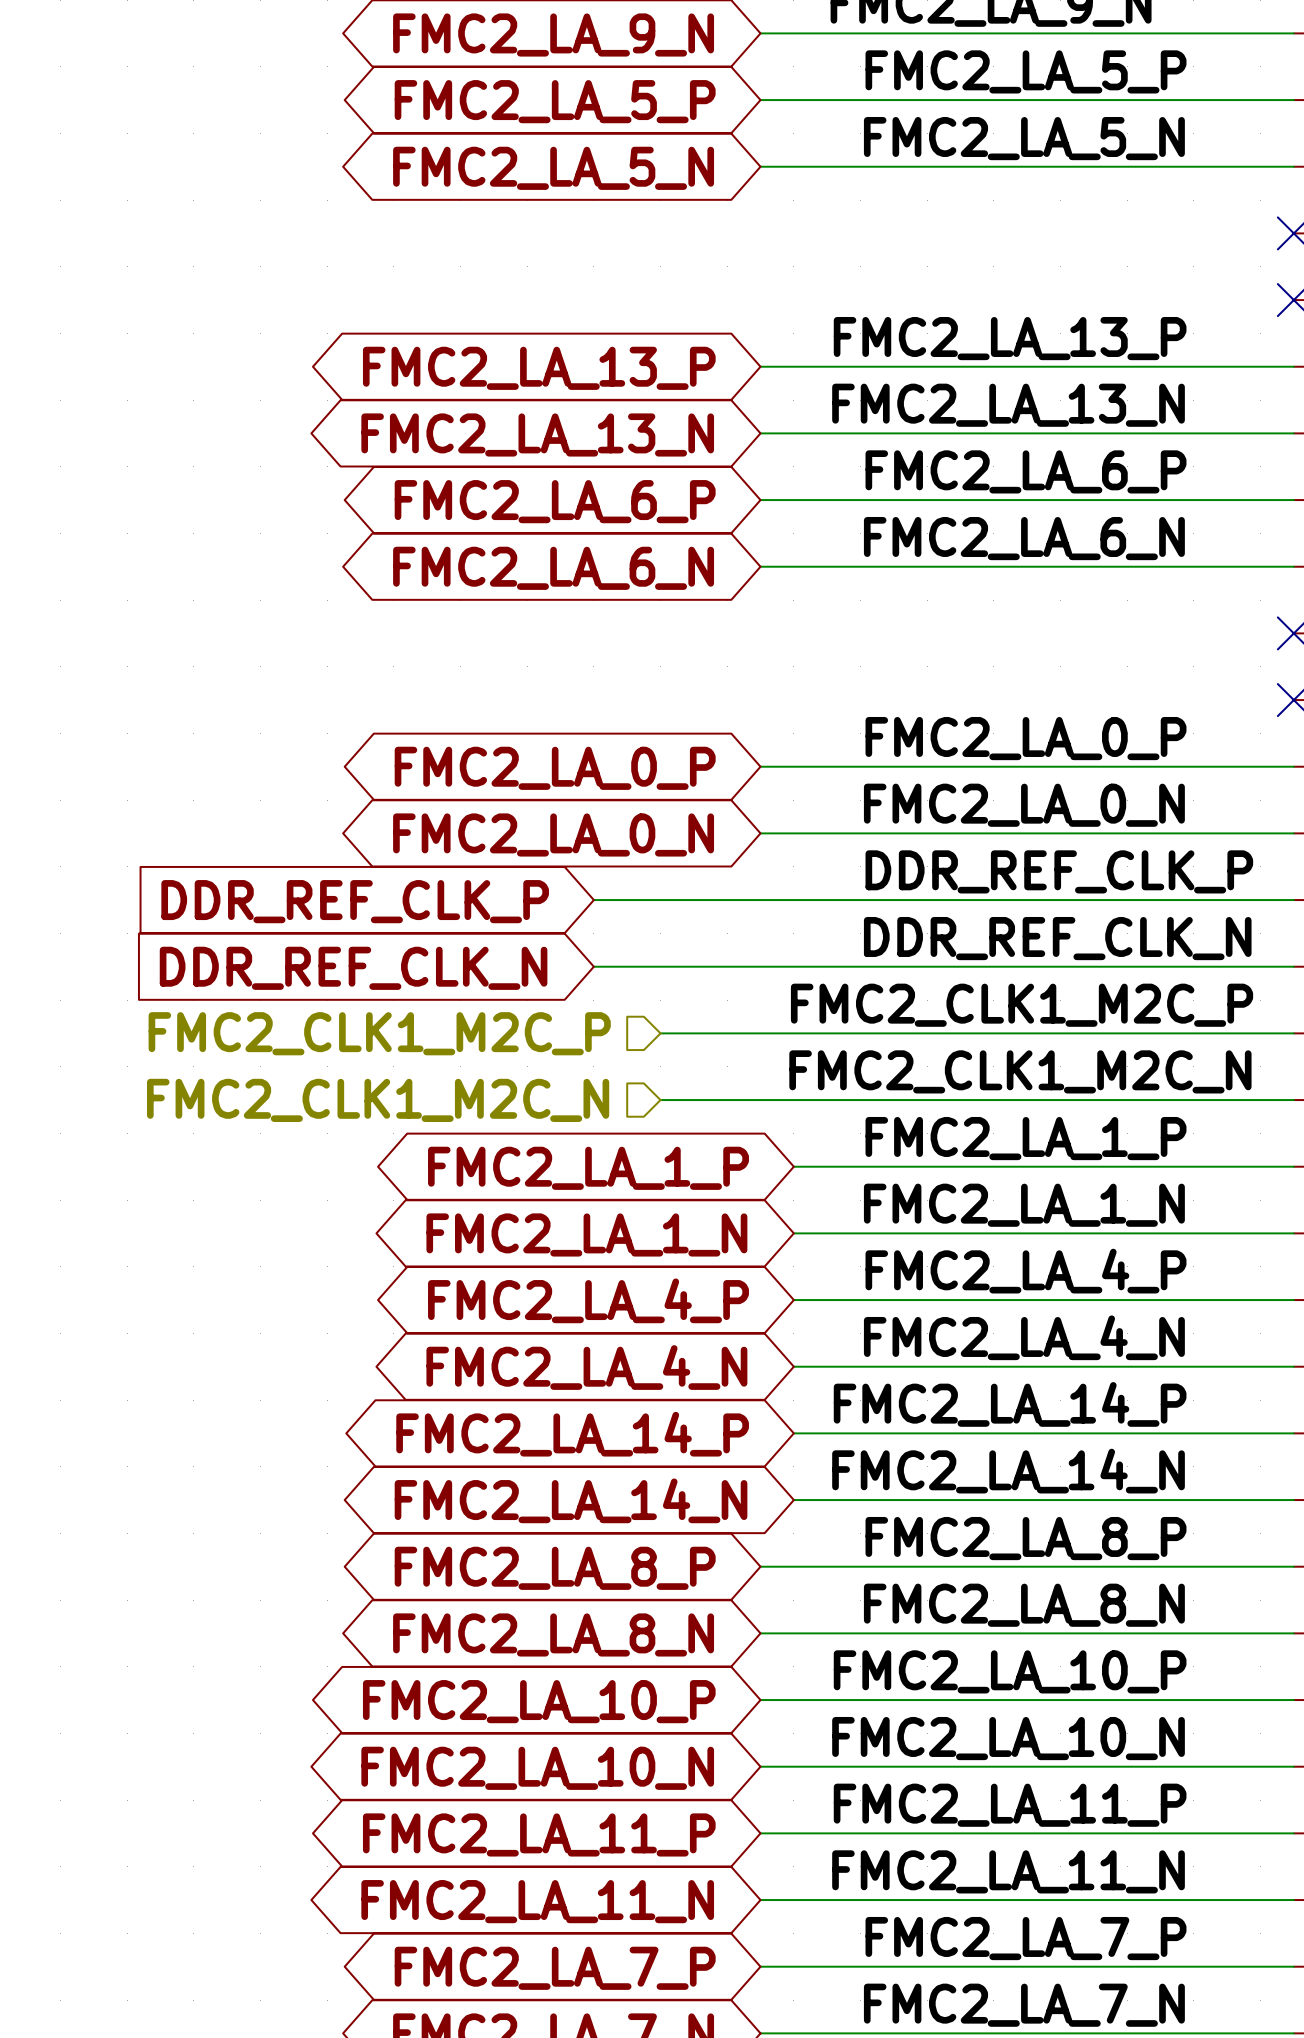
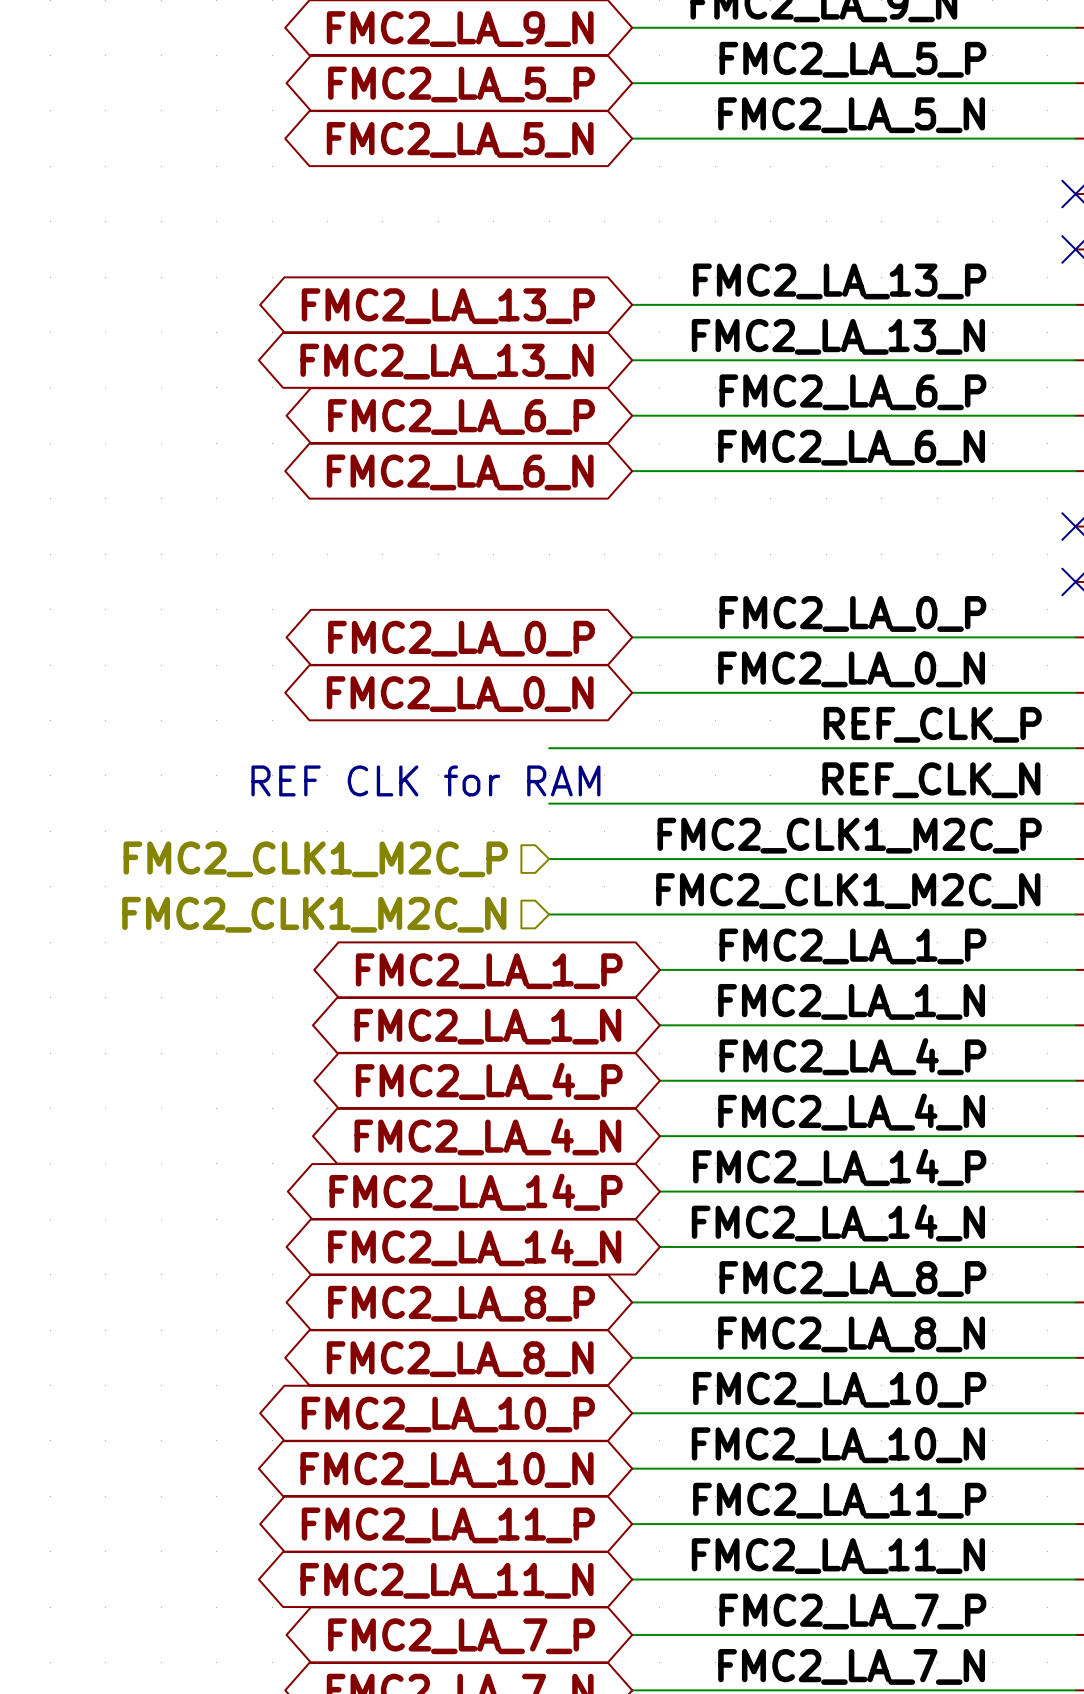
label: DDR_REF_CLK_P (1059, 871) -> REF_CLK_P (932, 724)
wire: (593, 900) (660, 900) -> none
global label: DDR_REF_CLK_P (355, 901) -> none
label: DDR_REF_CLK_N (1057, 938) -> REF_CLK_N (931, 780)
text: none -> REF CLK for RAM (425, 780)
wire: (593, 966) (660, 966) -> none
global label: DDR_REF_CLK_N (353, 968) -> none

